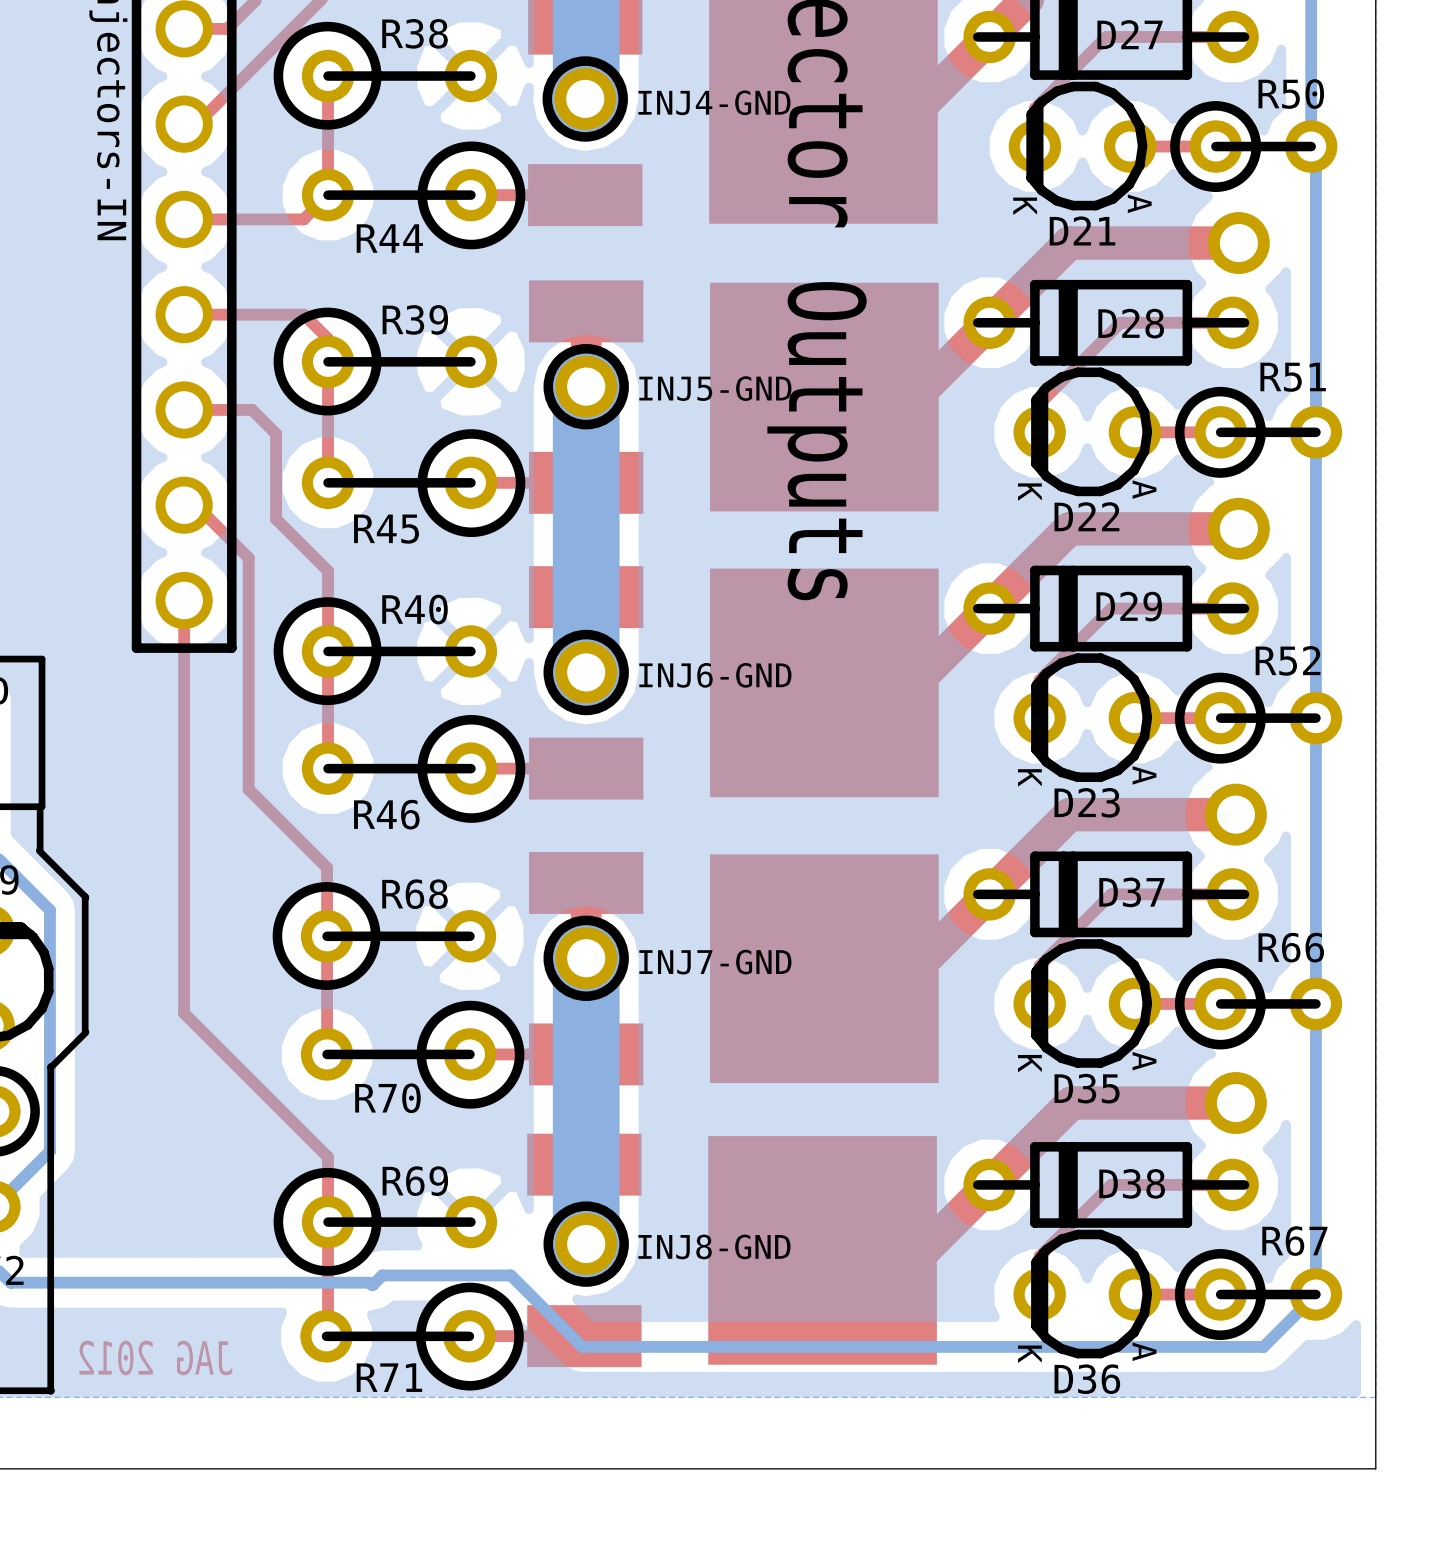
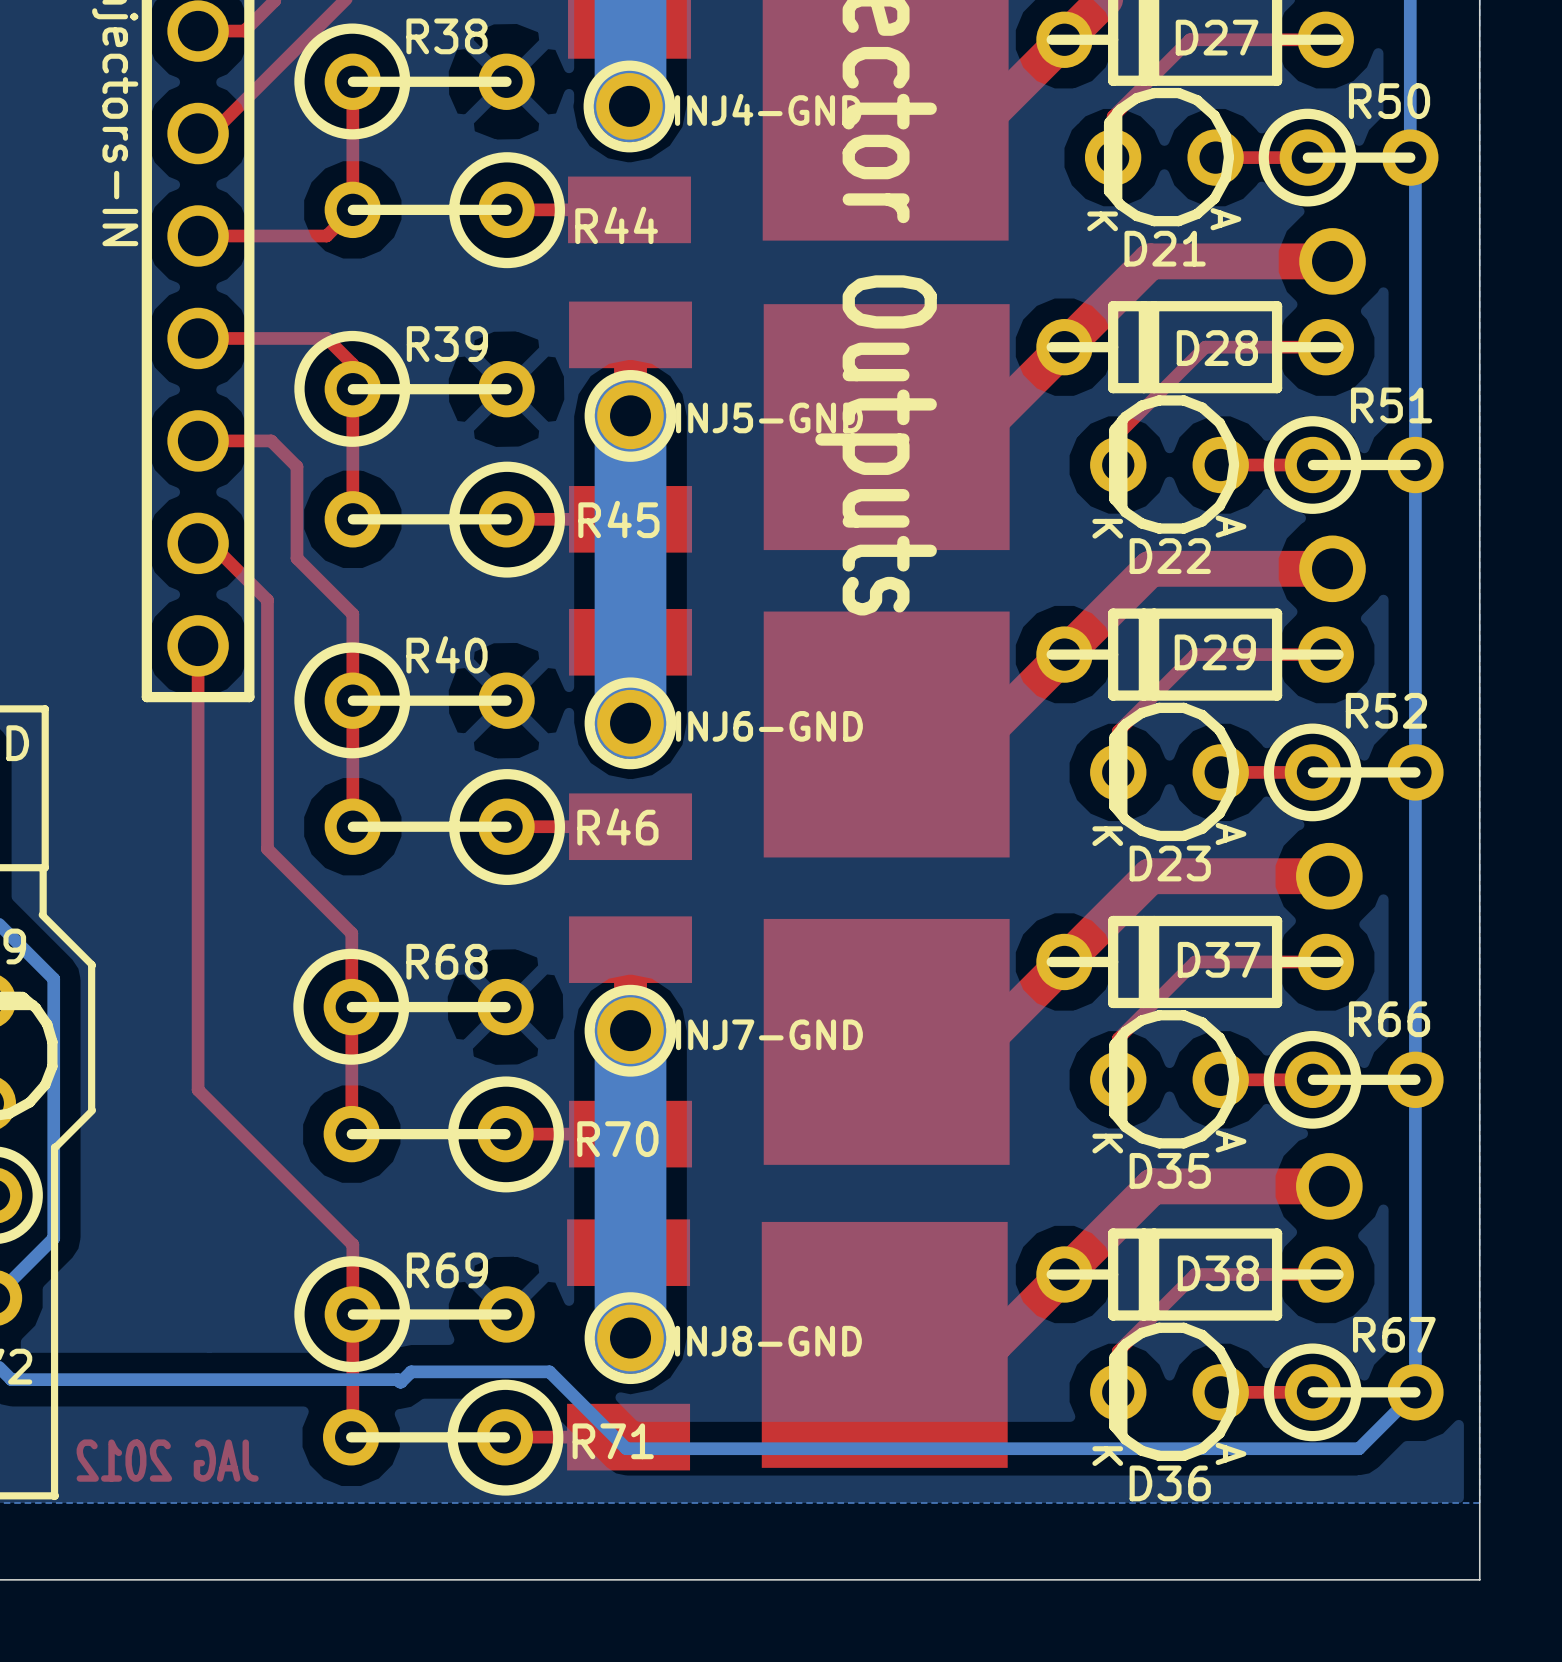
R44 name position: R44 (389, 238) -> R44 (616, 225)
R45 name position: R45 (386, 529) -> R45 (618, 519)
R46 name position: R46 (386, 814) -> R46 (617, 826)
R70 name position: R70 (387, 1098) -> R70 (617, 1139)
R71 name position: R71 (389, 1377) -> R71 (613, 1441)

